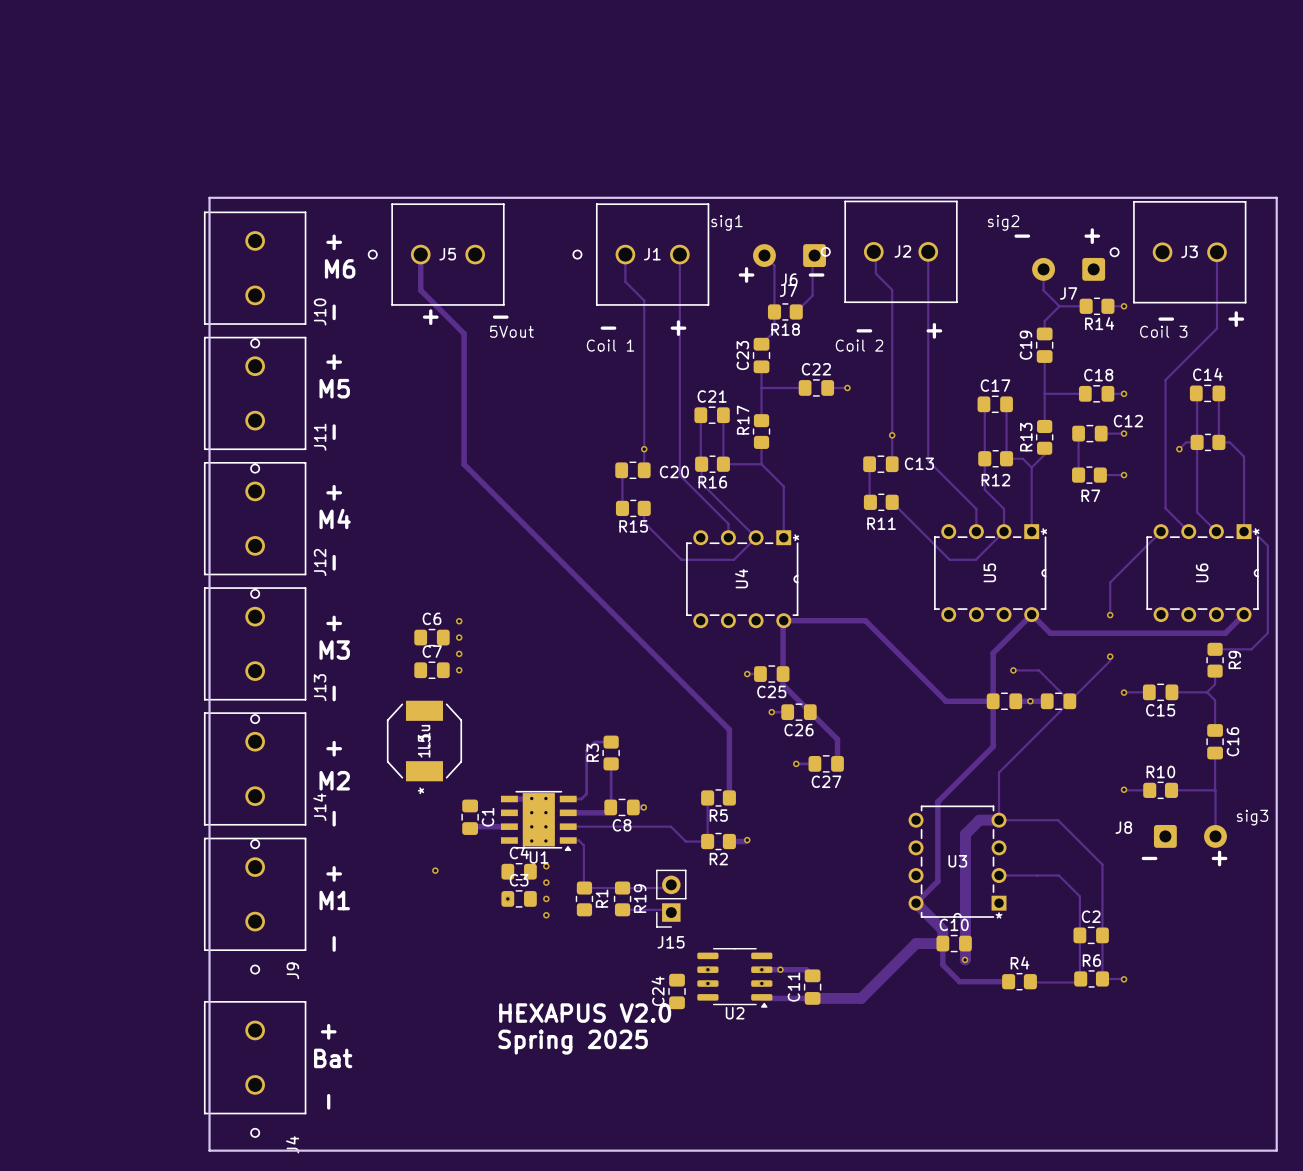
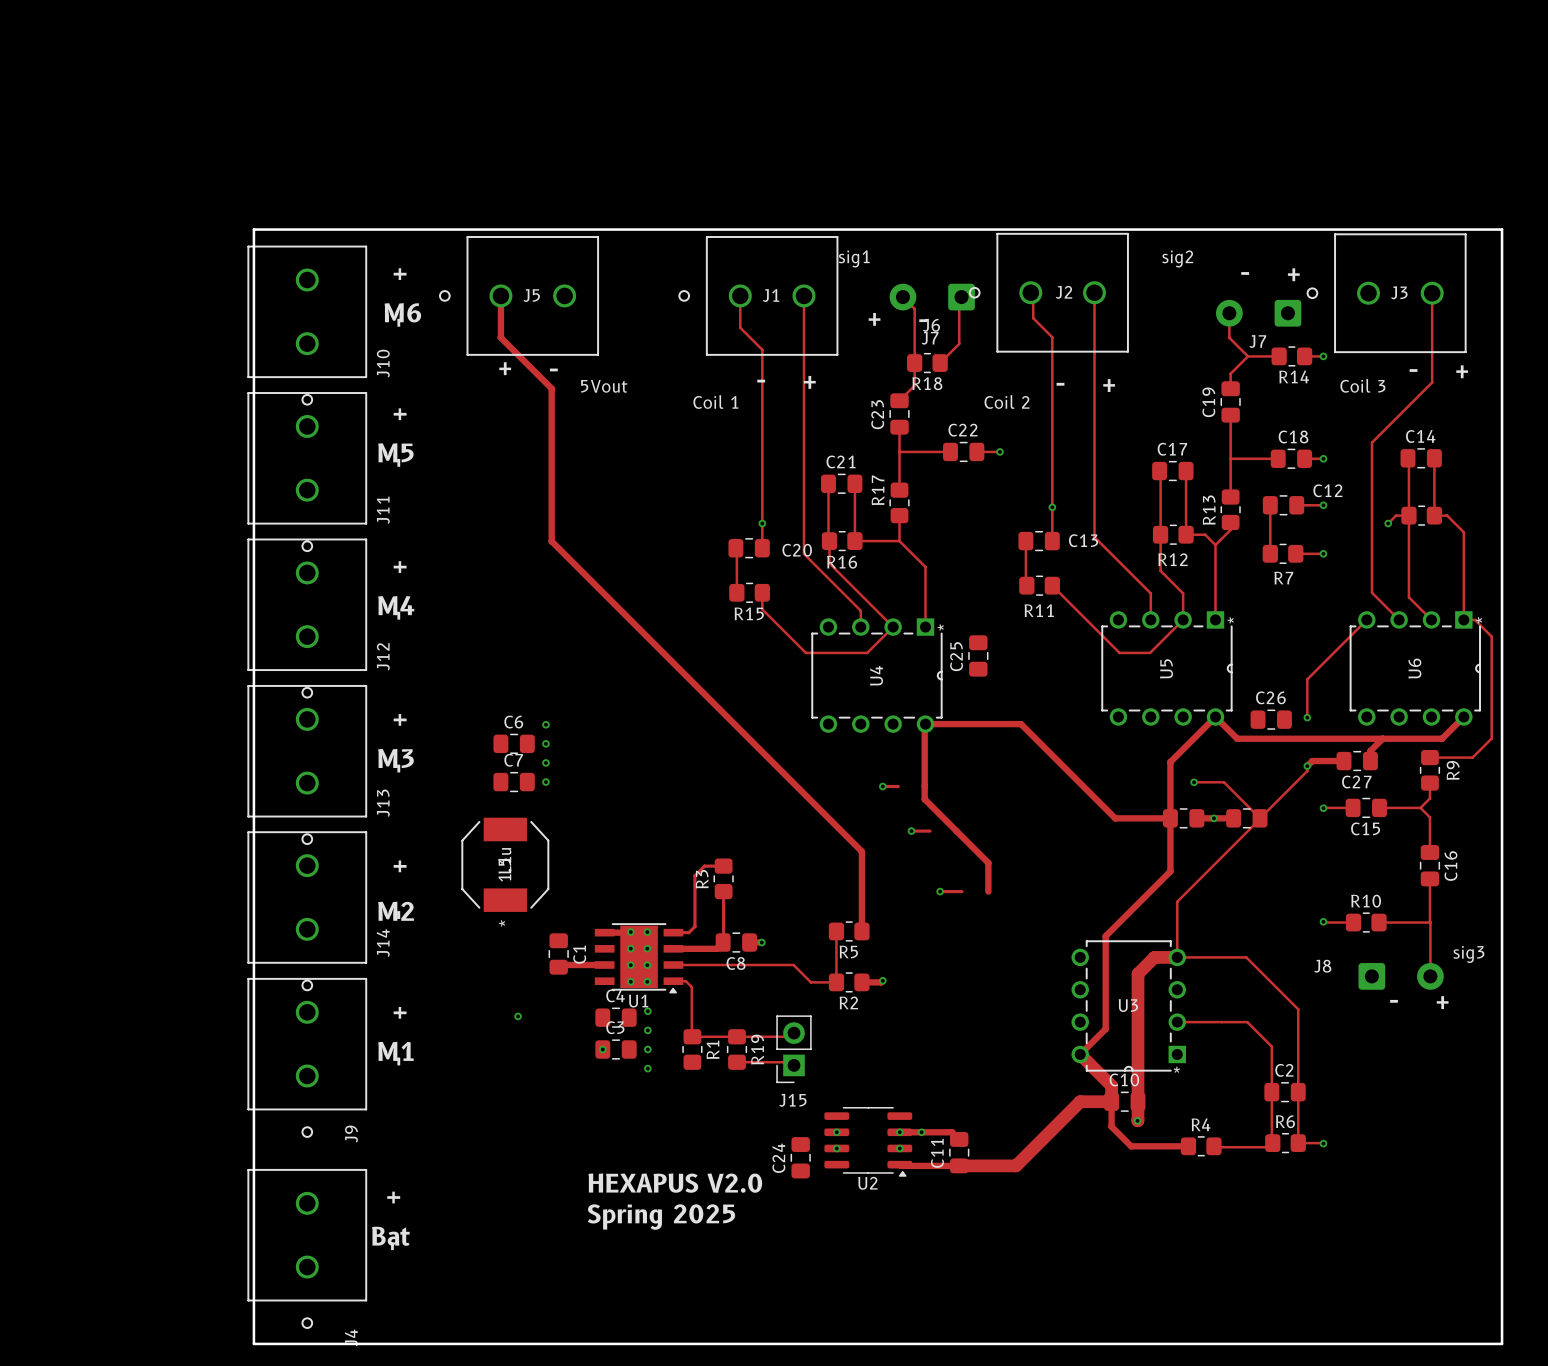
track: none -> (1382, 738) (1370, 751) (1370, 761)
track: none -> (1344, 761) (1312, 761) (1307, 766)
C25 rotation: 0° (771, 674) -> 90° clockwise (978, 655)
C25 position: (771, 674) -> (978, 655)
C26 position: (798, 712) -> (1271, 719)
C26 name position: C26 (798, 730) -> C26 (1270, 697)
C27 position: (826, 763) -> (1357, 761)

